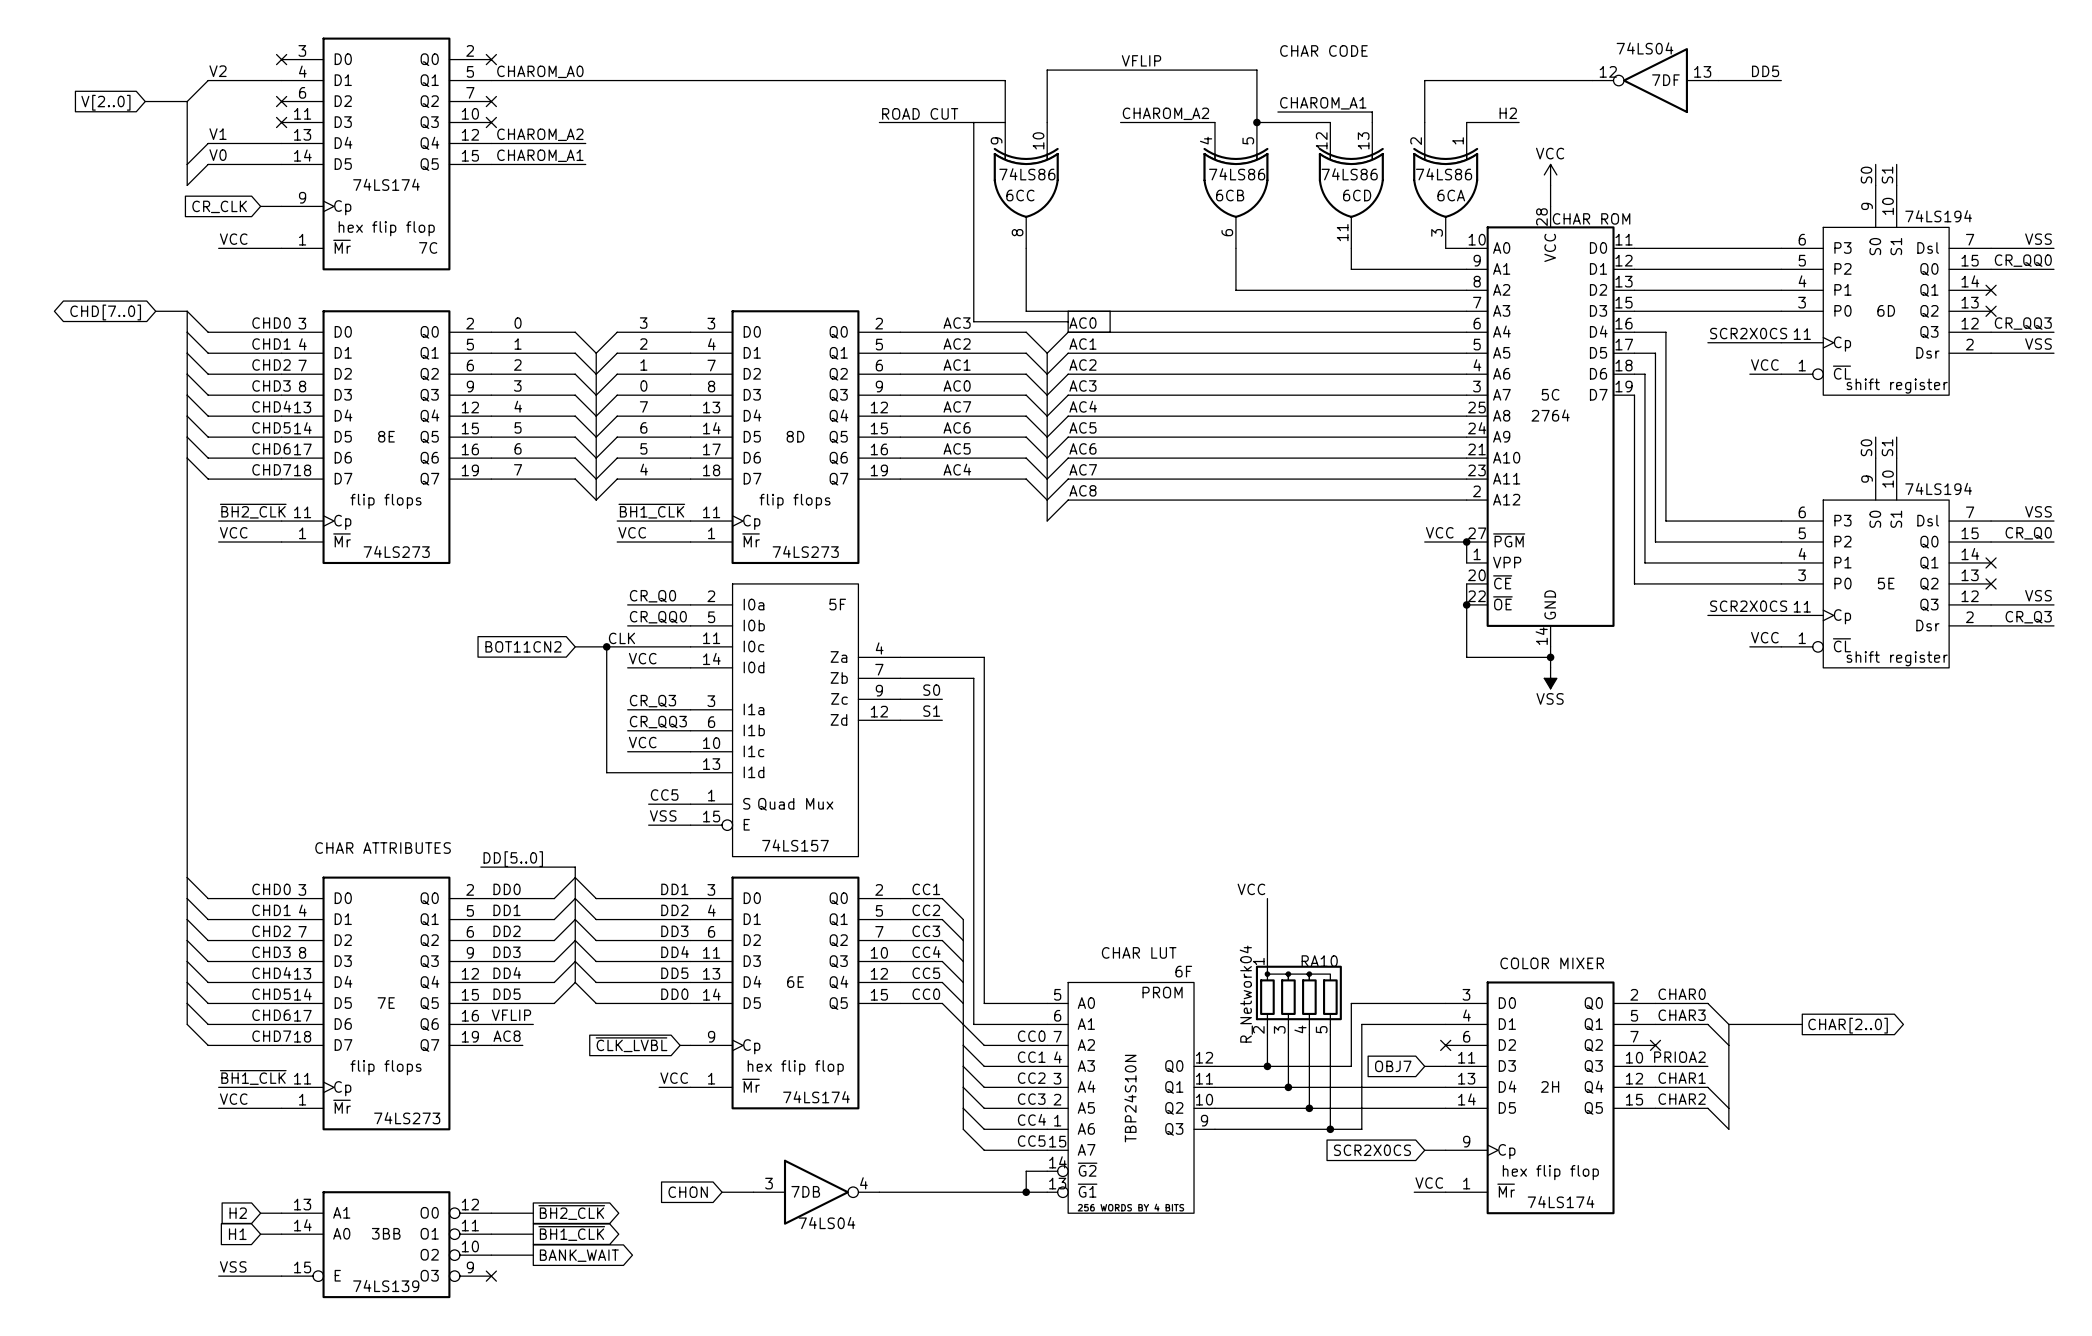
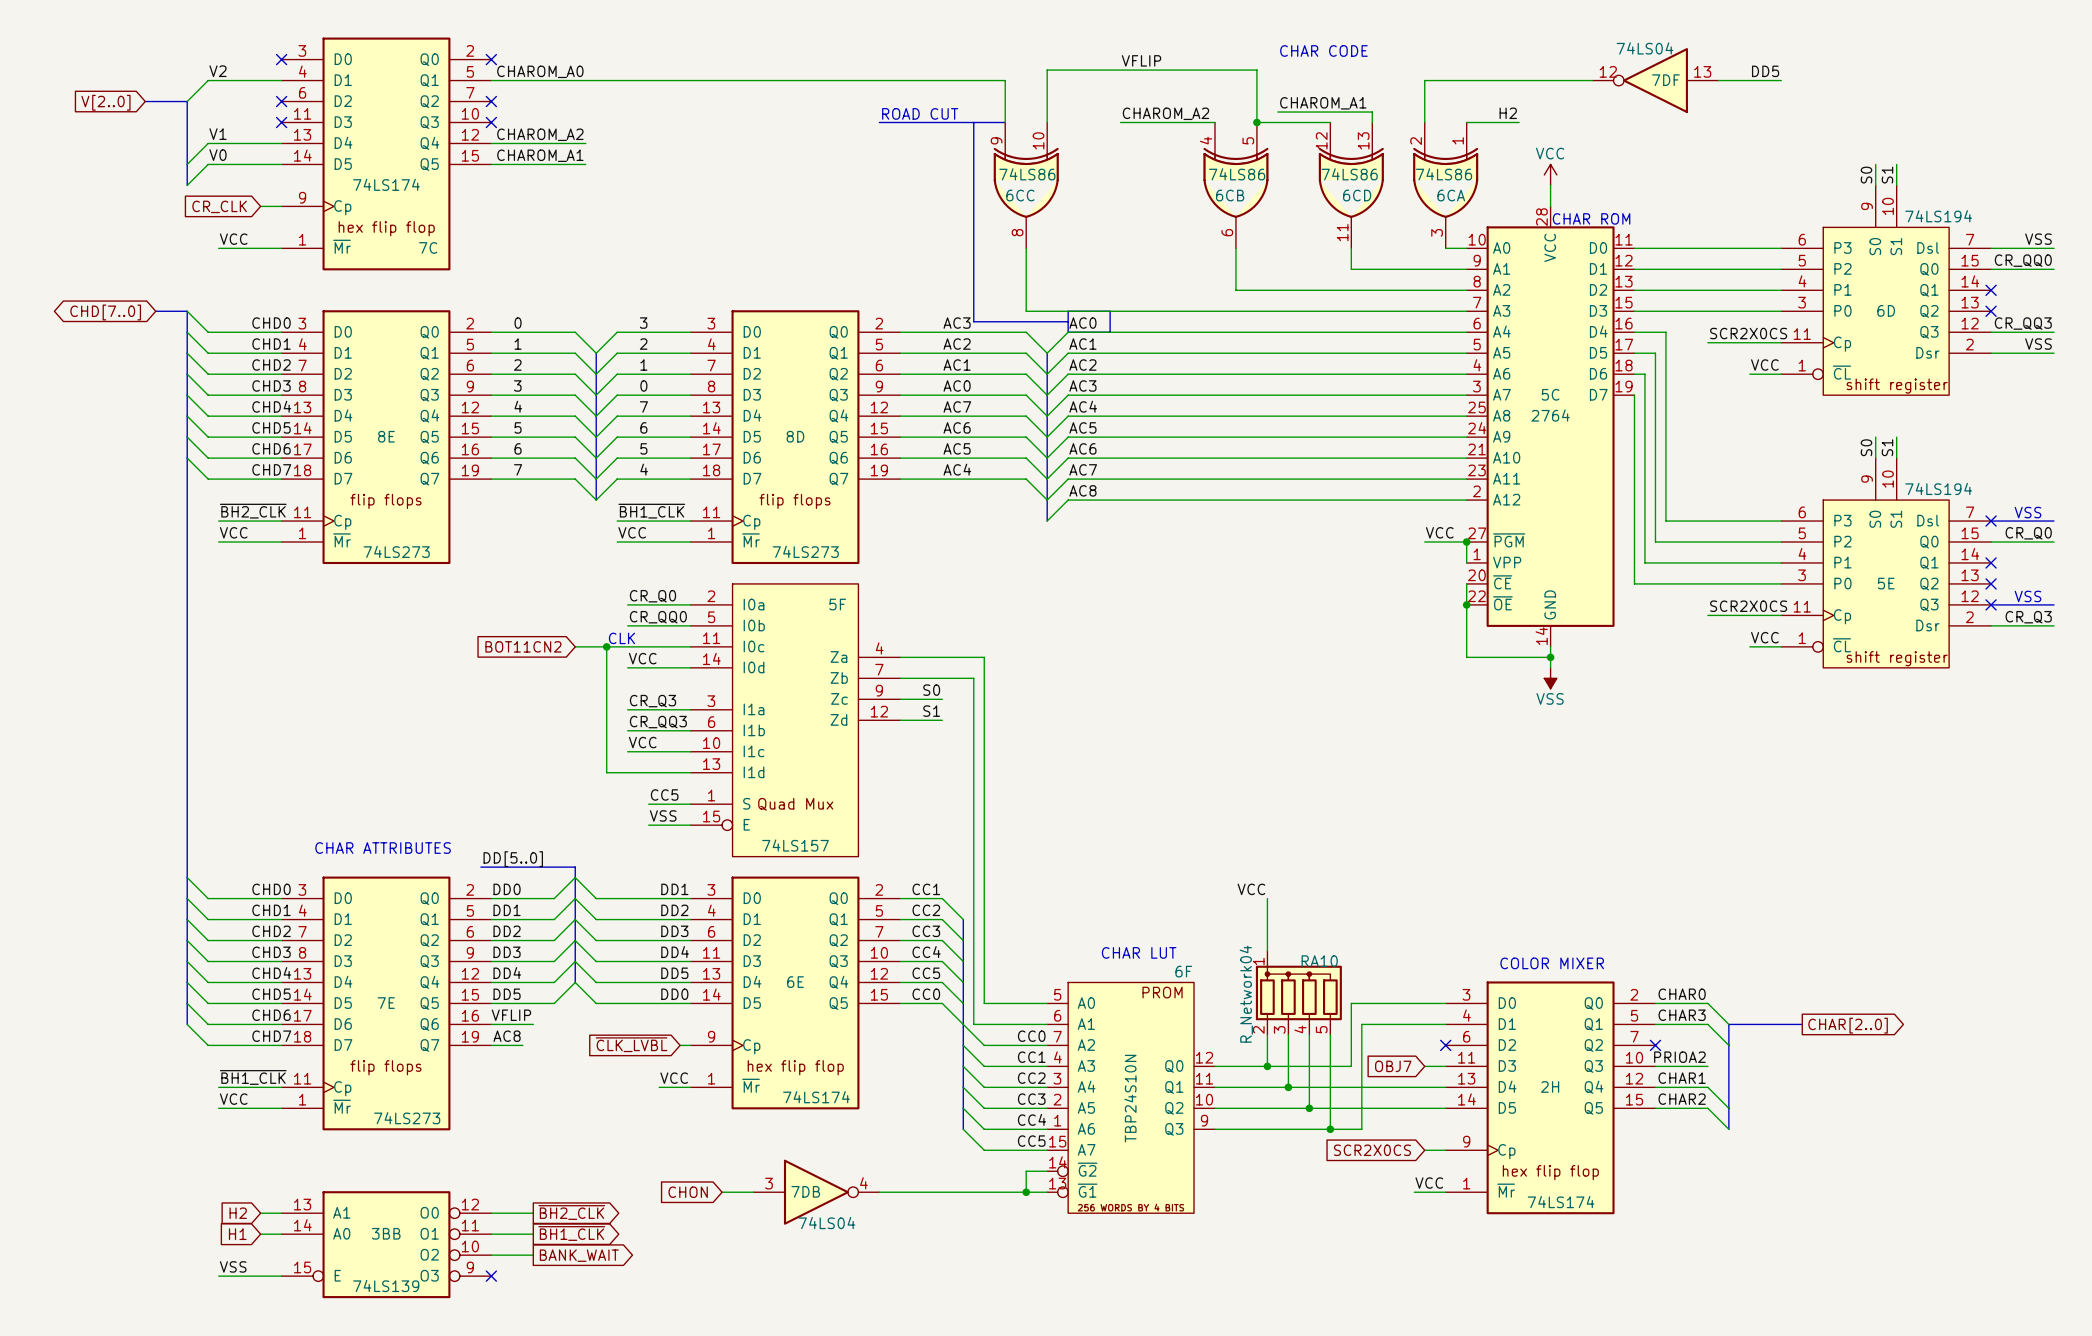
label: VSS (2038, 511) -> none
text: none -> VSS (2027, 512)
line: none -> (1991, 521) (2053, 521)
no-connect mark: none -> (1991, 521)
label: VSS (2038, 595) -> none
text: none -> VSS (2027, 596)
line: none -> (1991, 604) (2053, 604)
no-connect mark: none -> (1991, 604)

